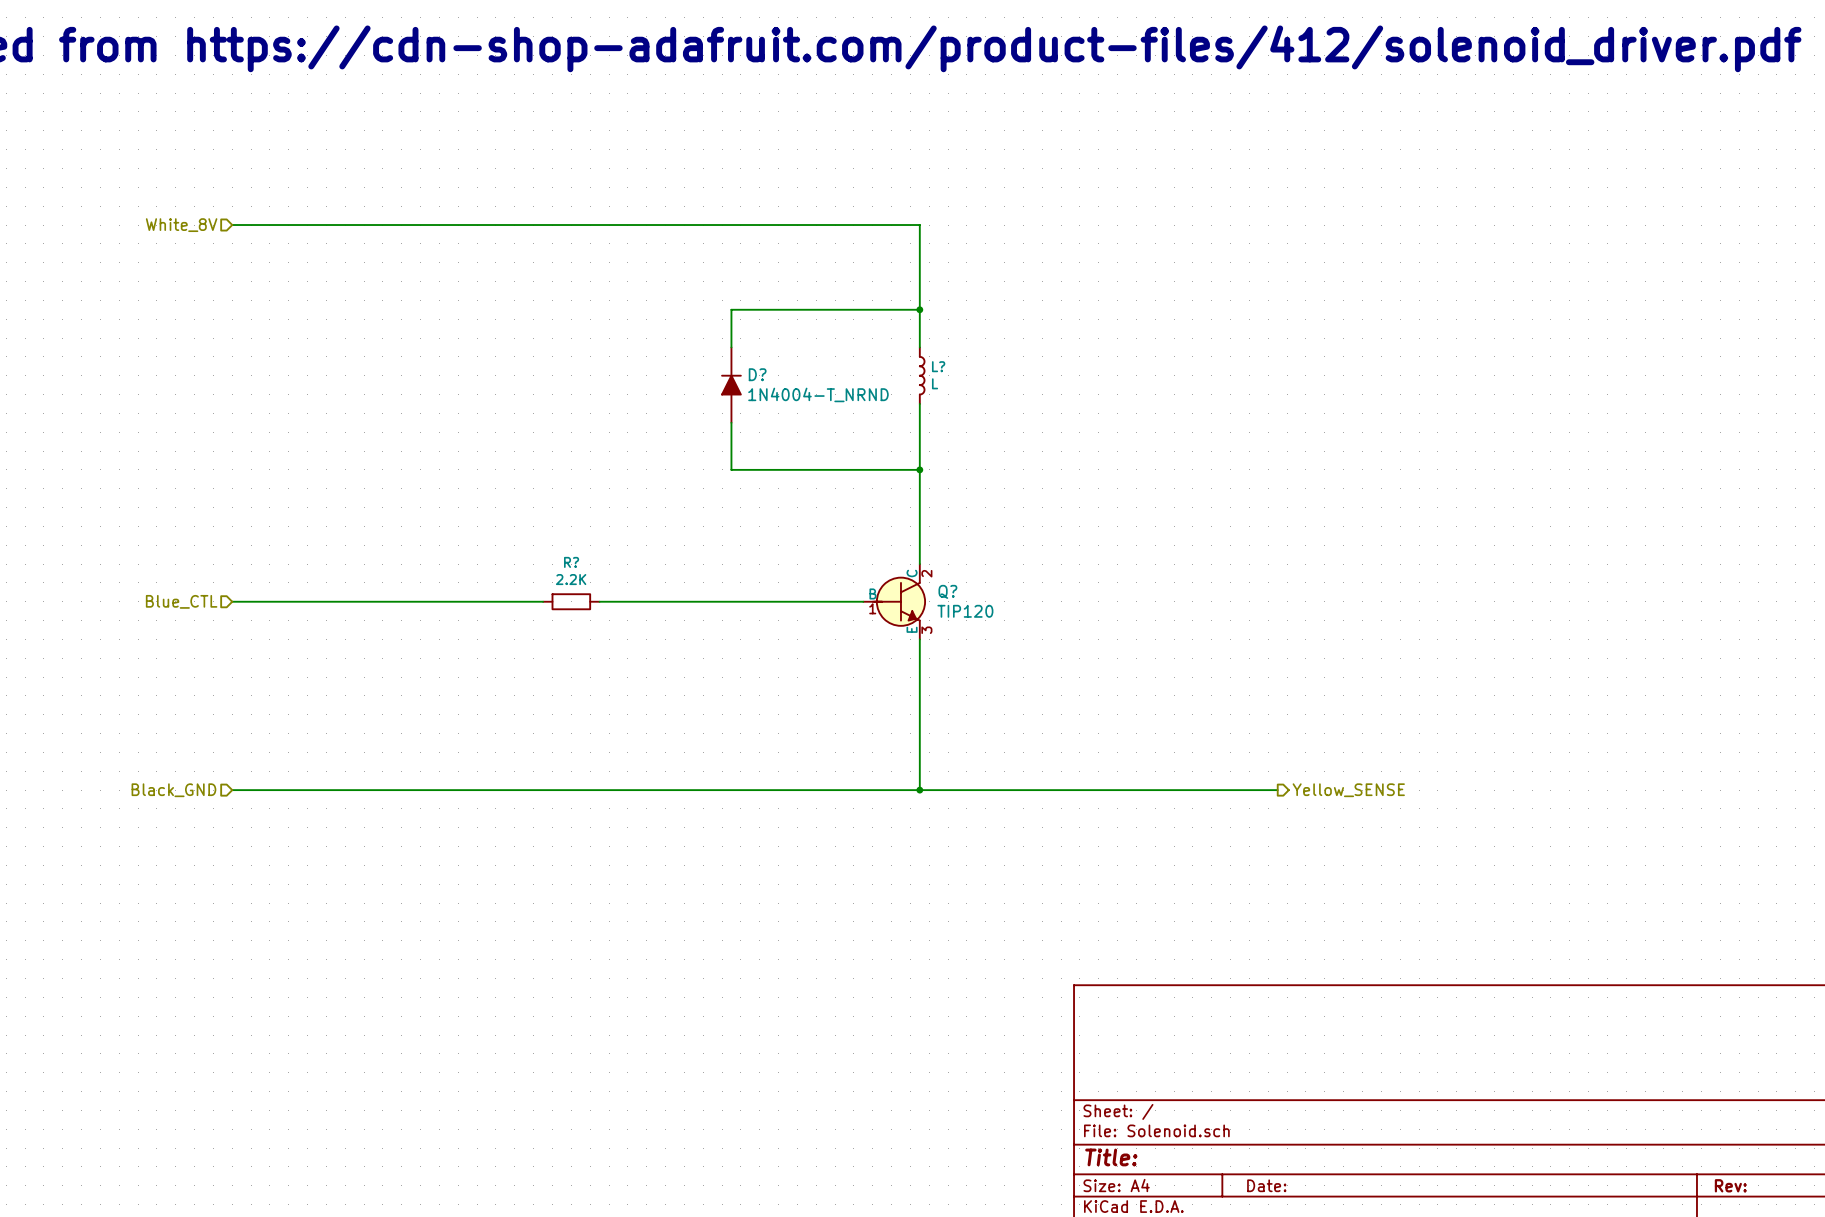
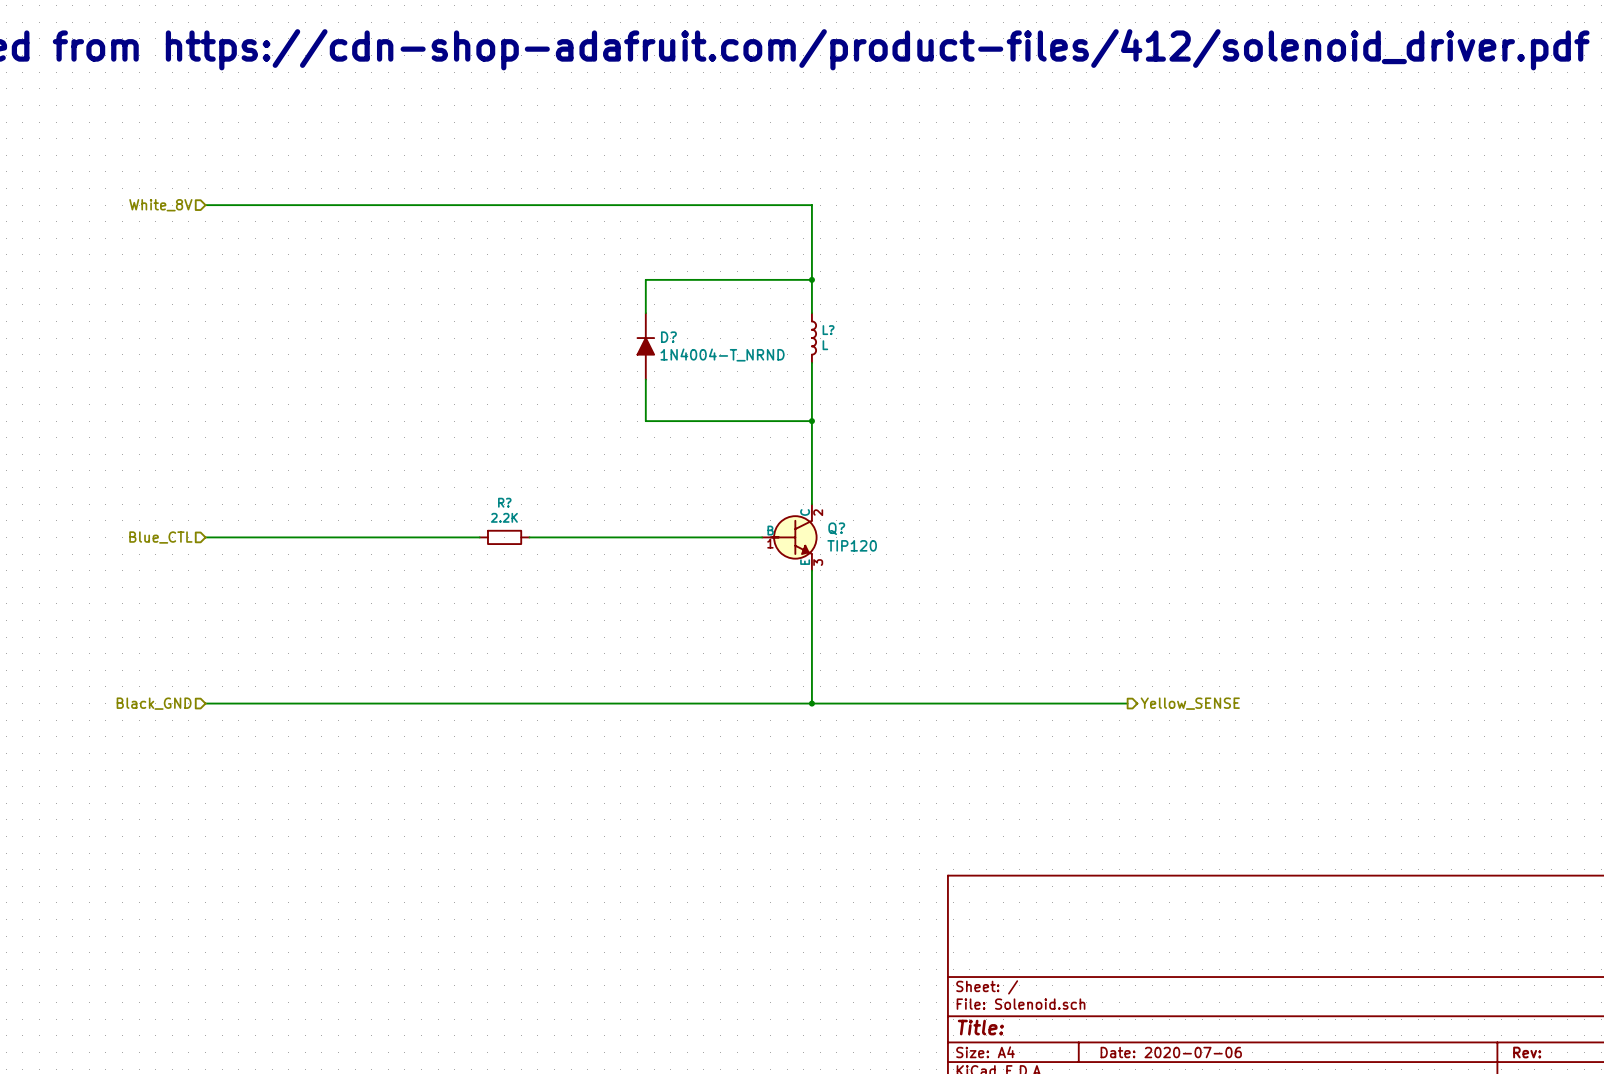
title block: Date: (1266, 1185) -> Date: 2020-07-06 (1171, 1052)

